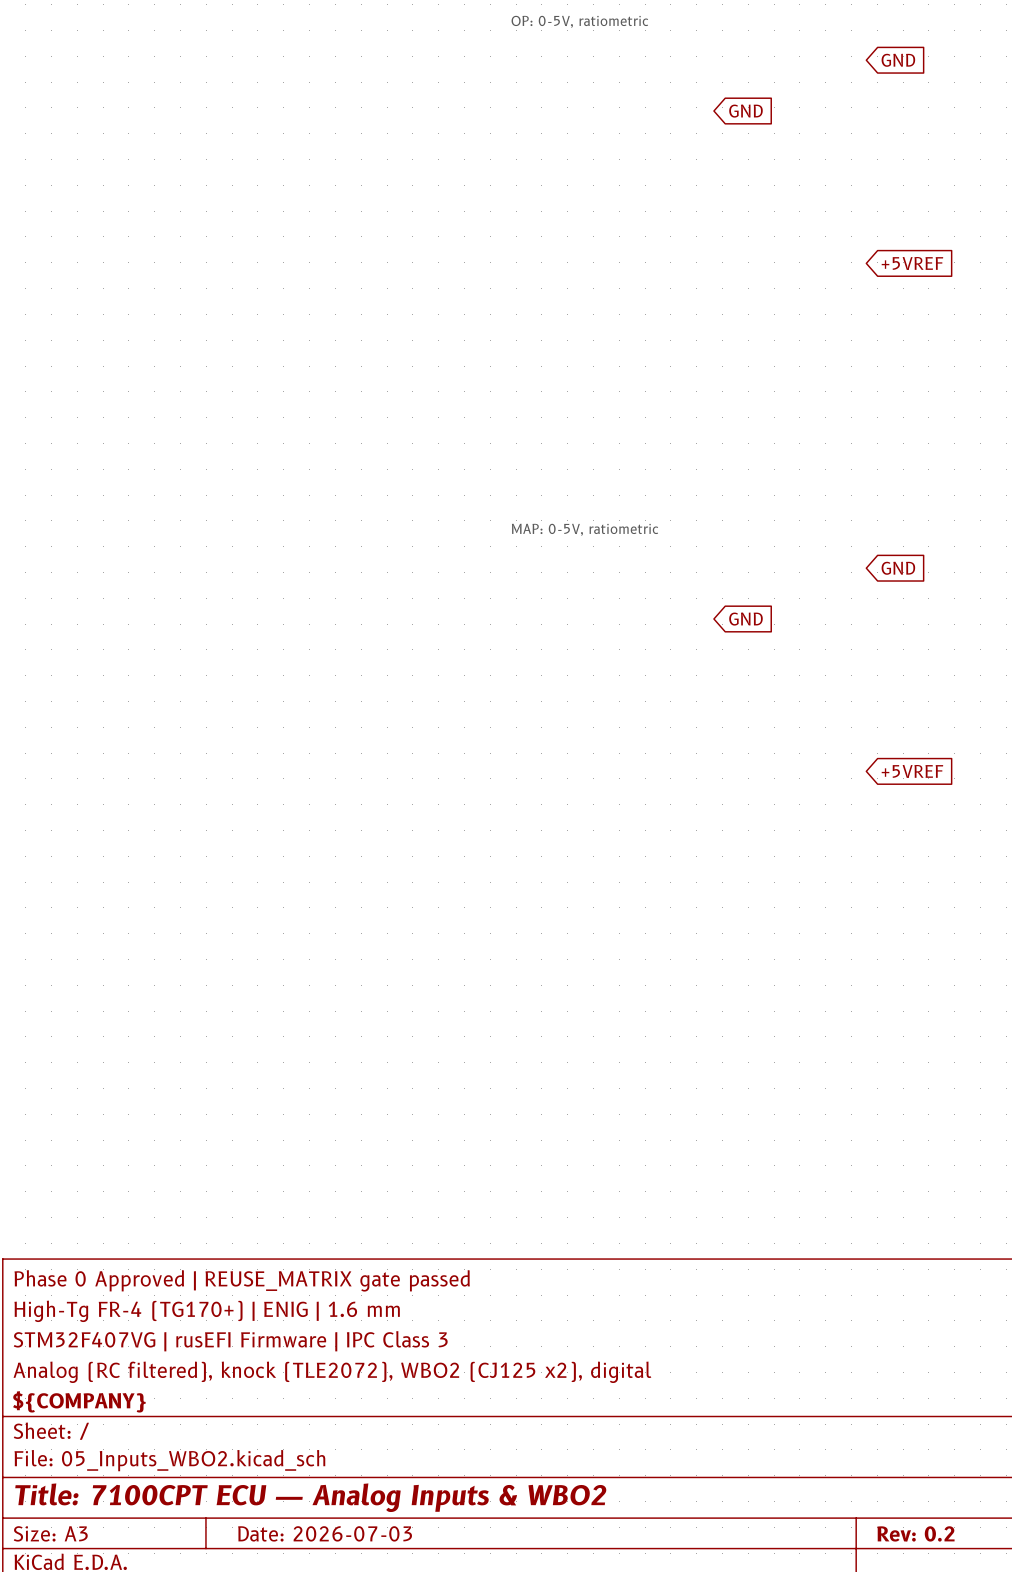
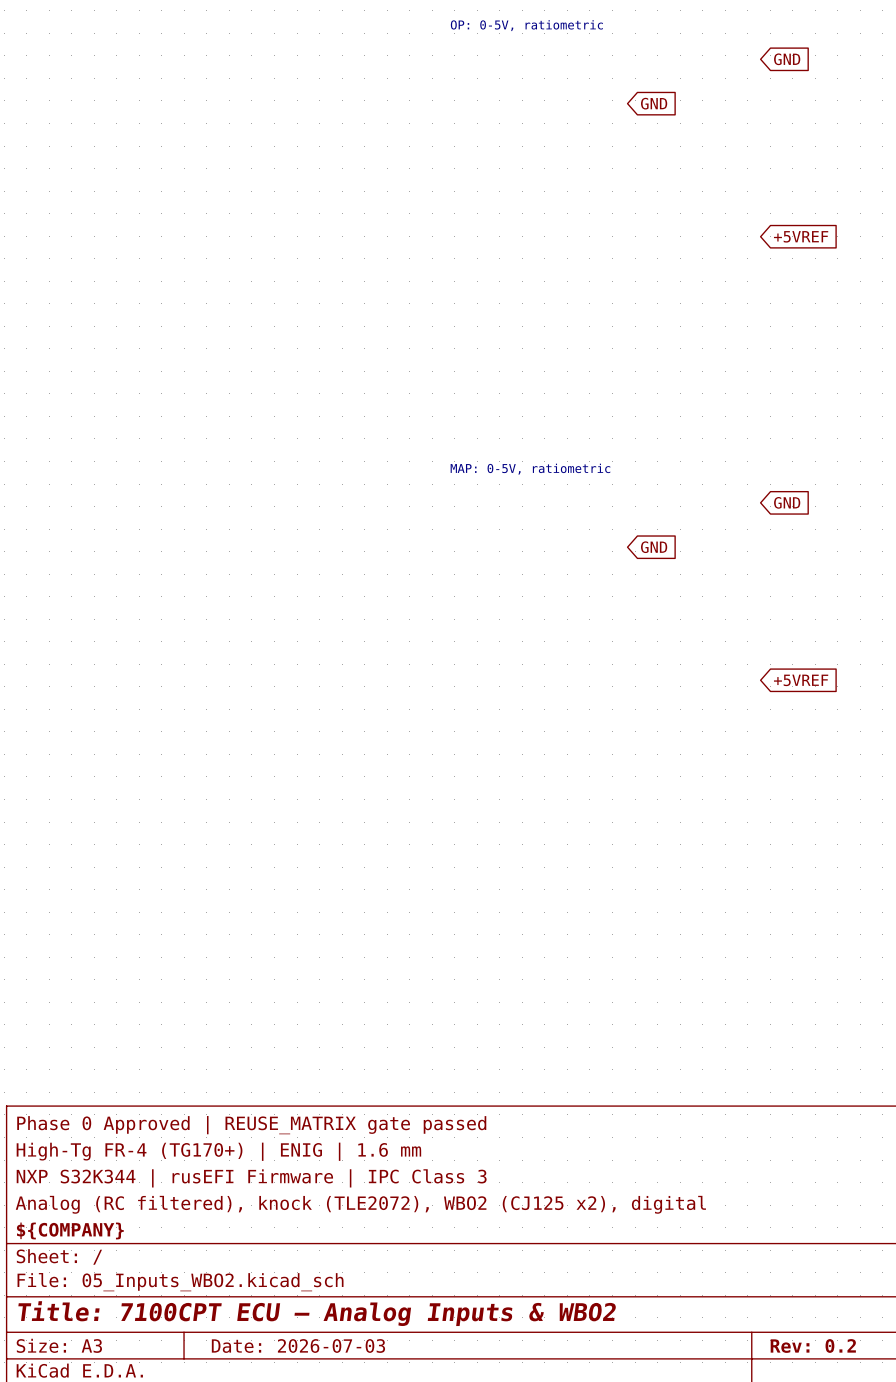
title block: STM32F407VG | rusEFI Firmware | IPC Class 3 (230, 1341) -> NXP S32K344 | rusEFI Firmware | IPC Class 3 (251, 1178)

